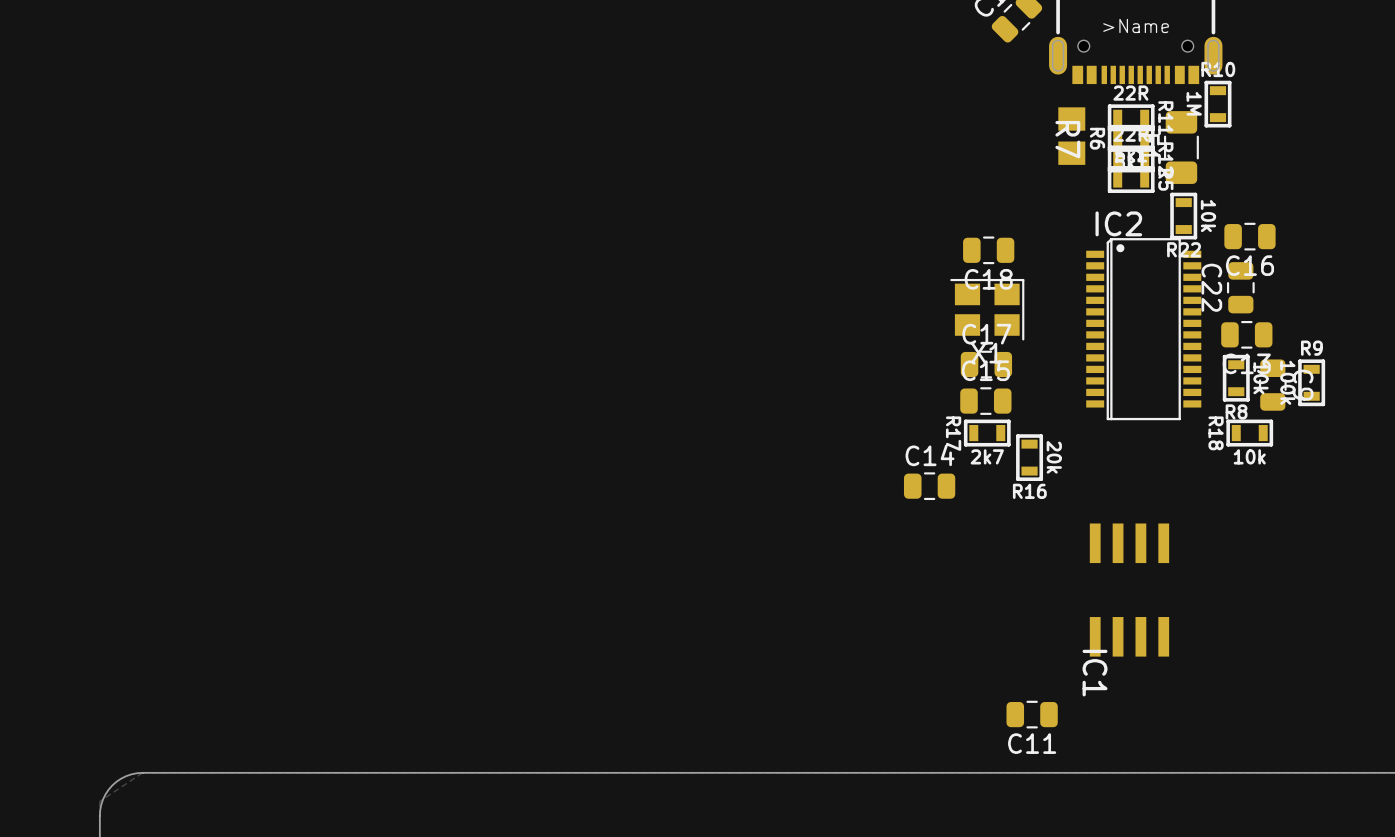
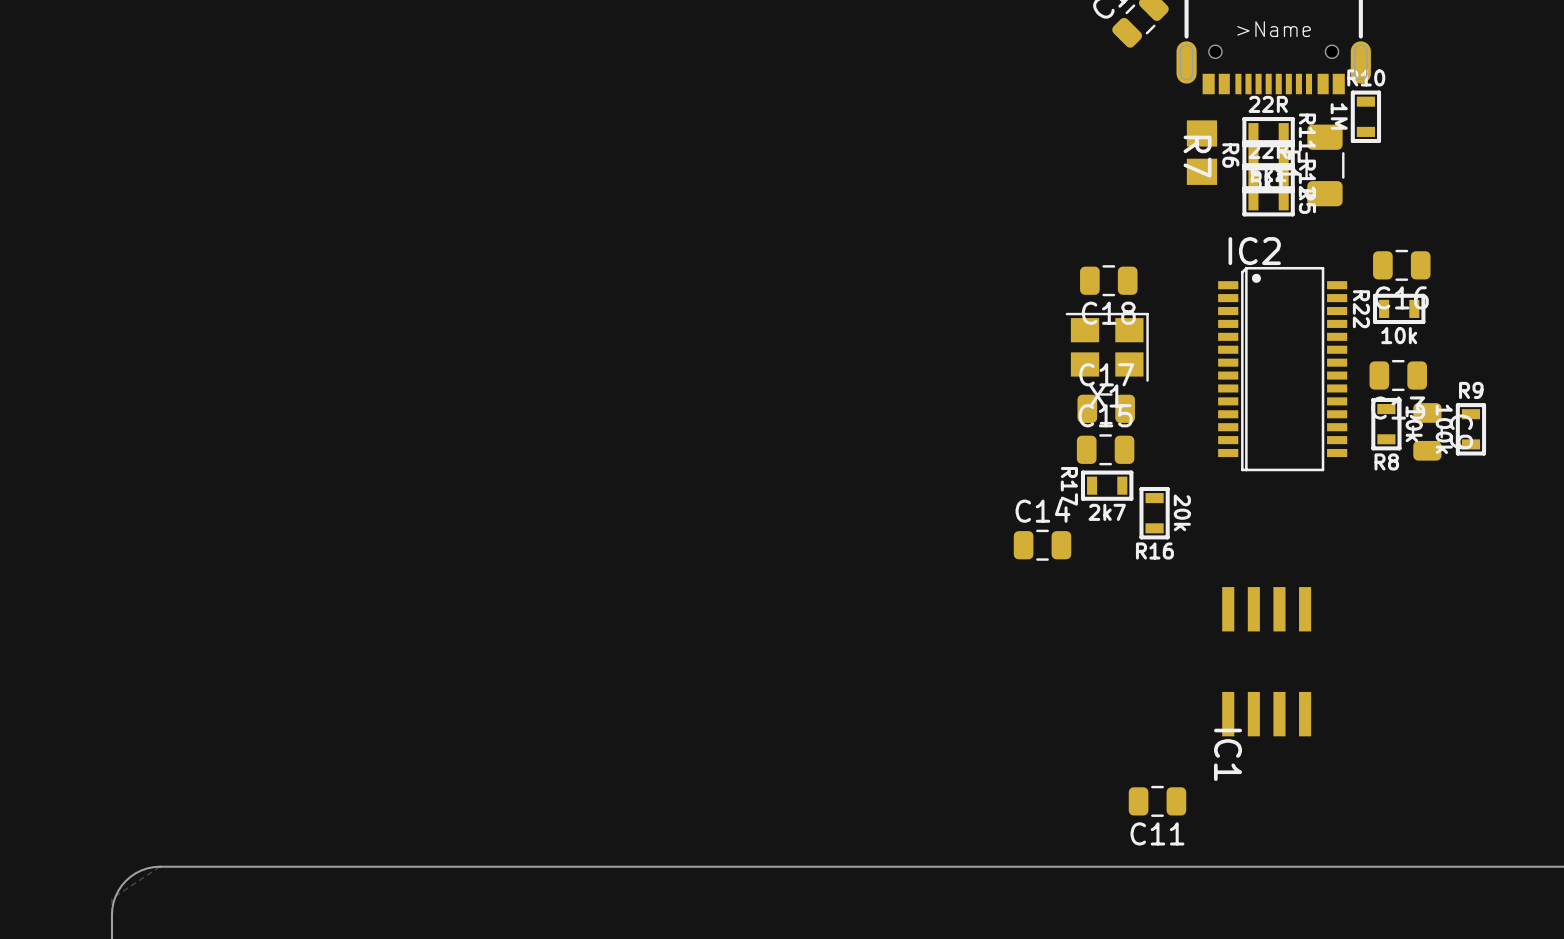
R22 rotation: 0° (1183, 216) -> 90° clockwise (1399, 308)
R22 position: (1183, 216) -> (1399, 308)
C22: (1240, 287) -> none
R18: 10k (1249, 433) -> none

